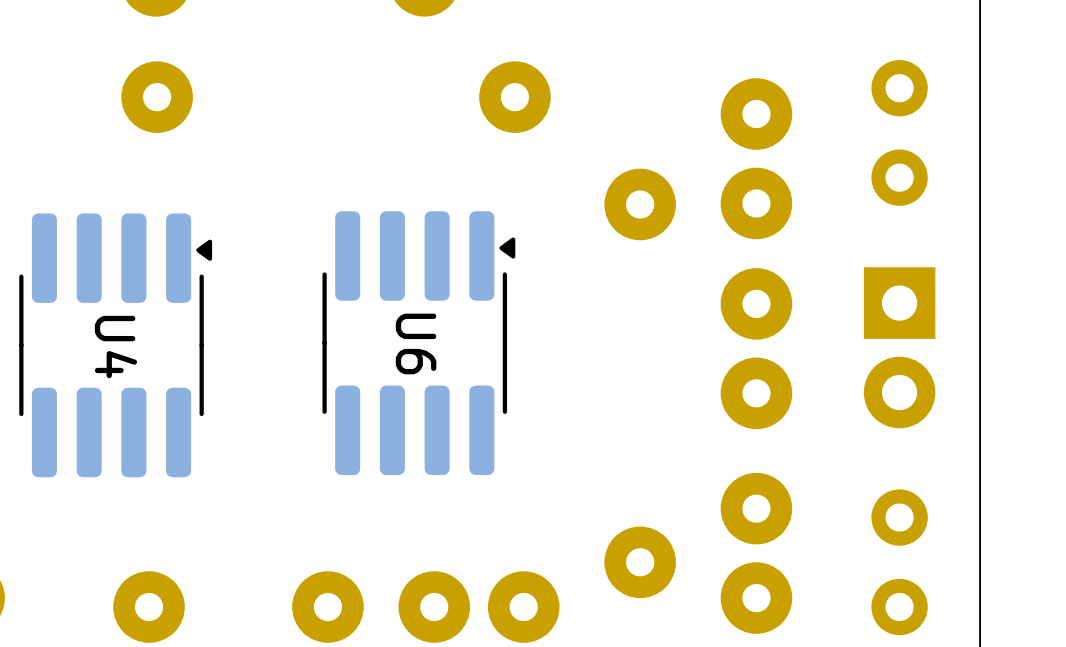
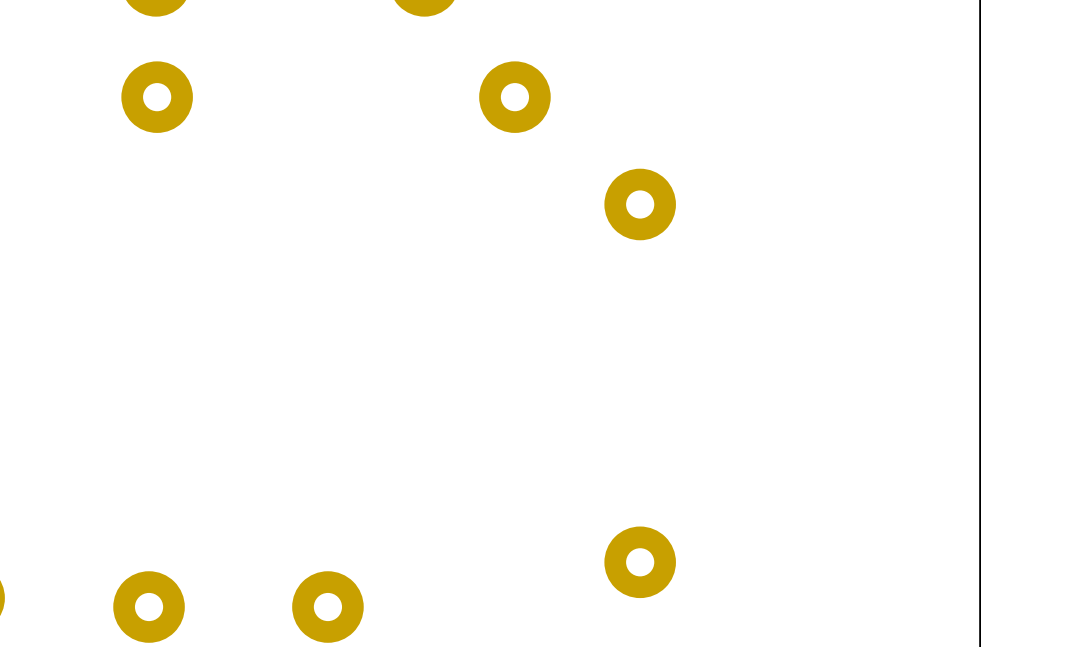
part: (899, 132) -> none
part: (756, 158) -> none
U6: (418, 343) -> none
U4: (115, 345) -> none
part: (899, 347) -> none
part: (756, 348) -> none
part: (756, 553) -> none
part: (899, 562) -> none
part: (478, 607) -> none

